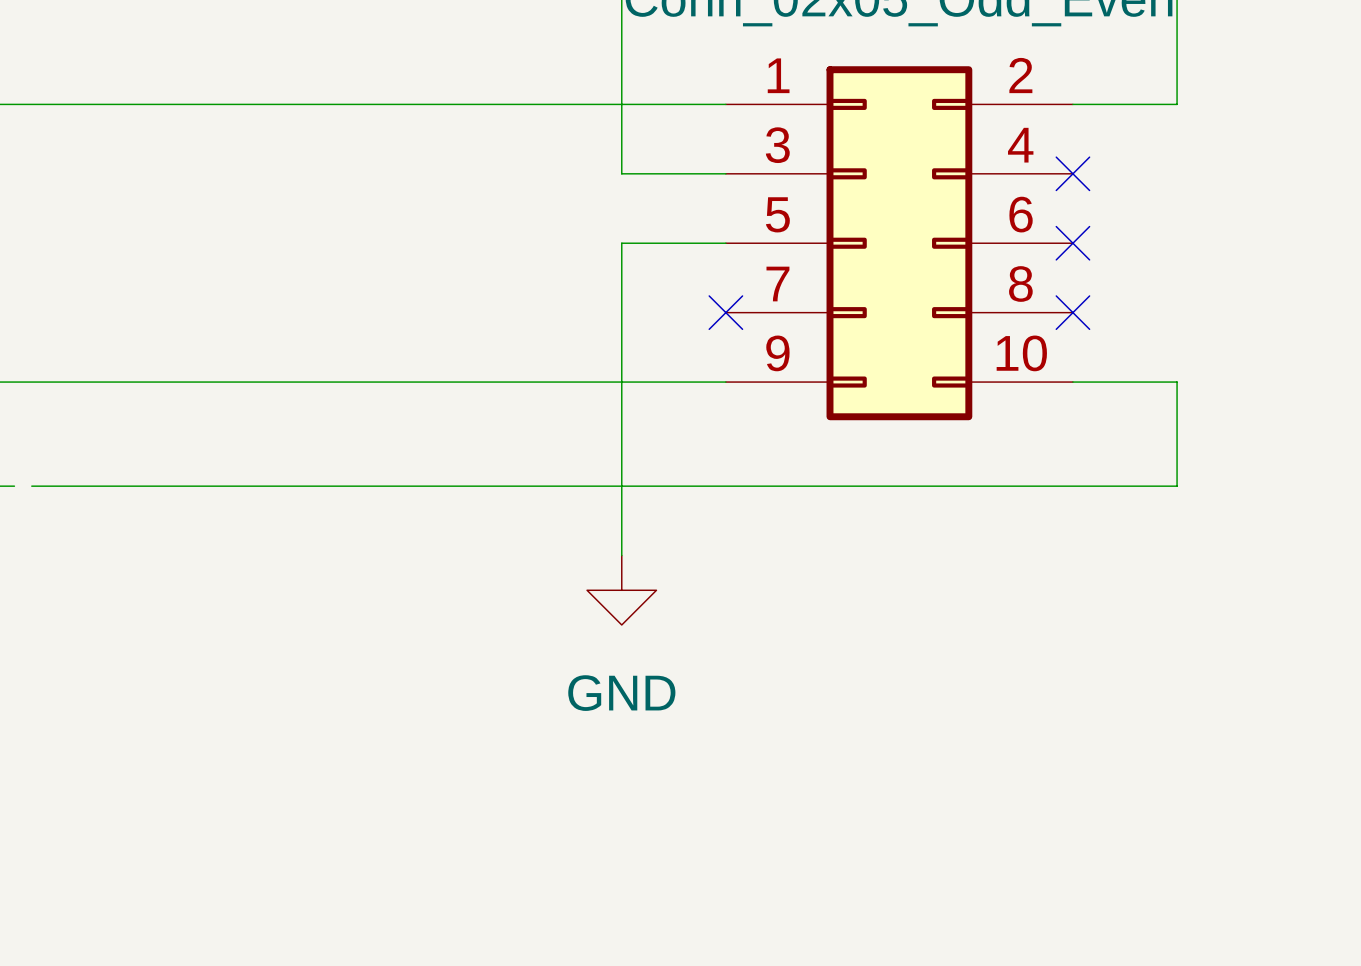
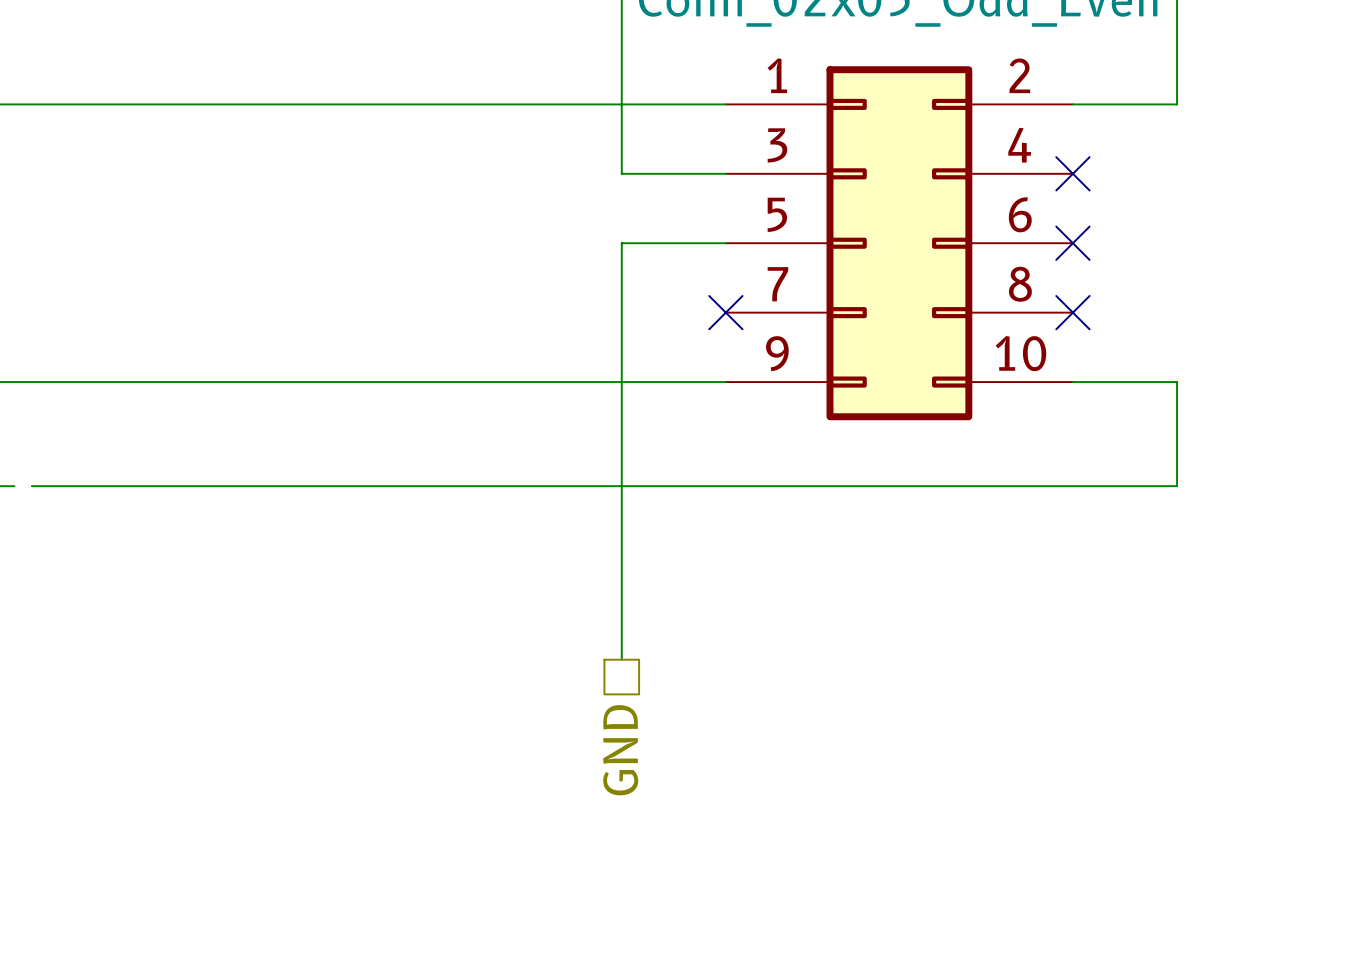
wire: none -> (621, 555) (621, 659)
power symbol: GND (621, 590) -> none
hierarchical label: none -> GND (620, 750)

